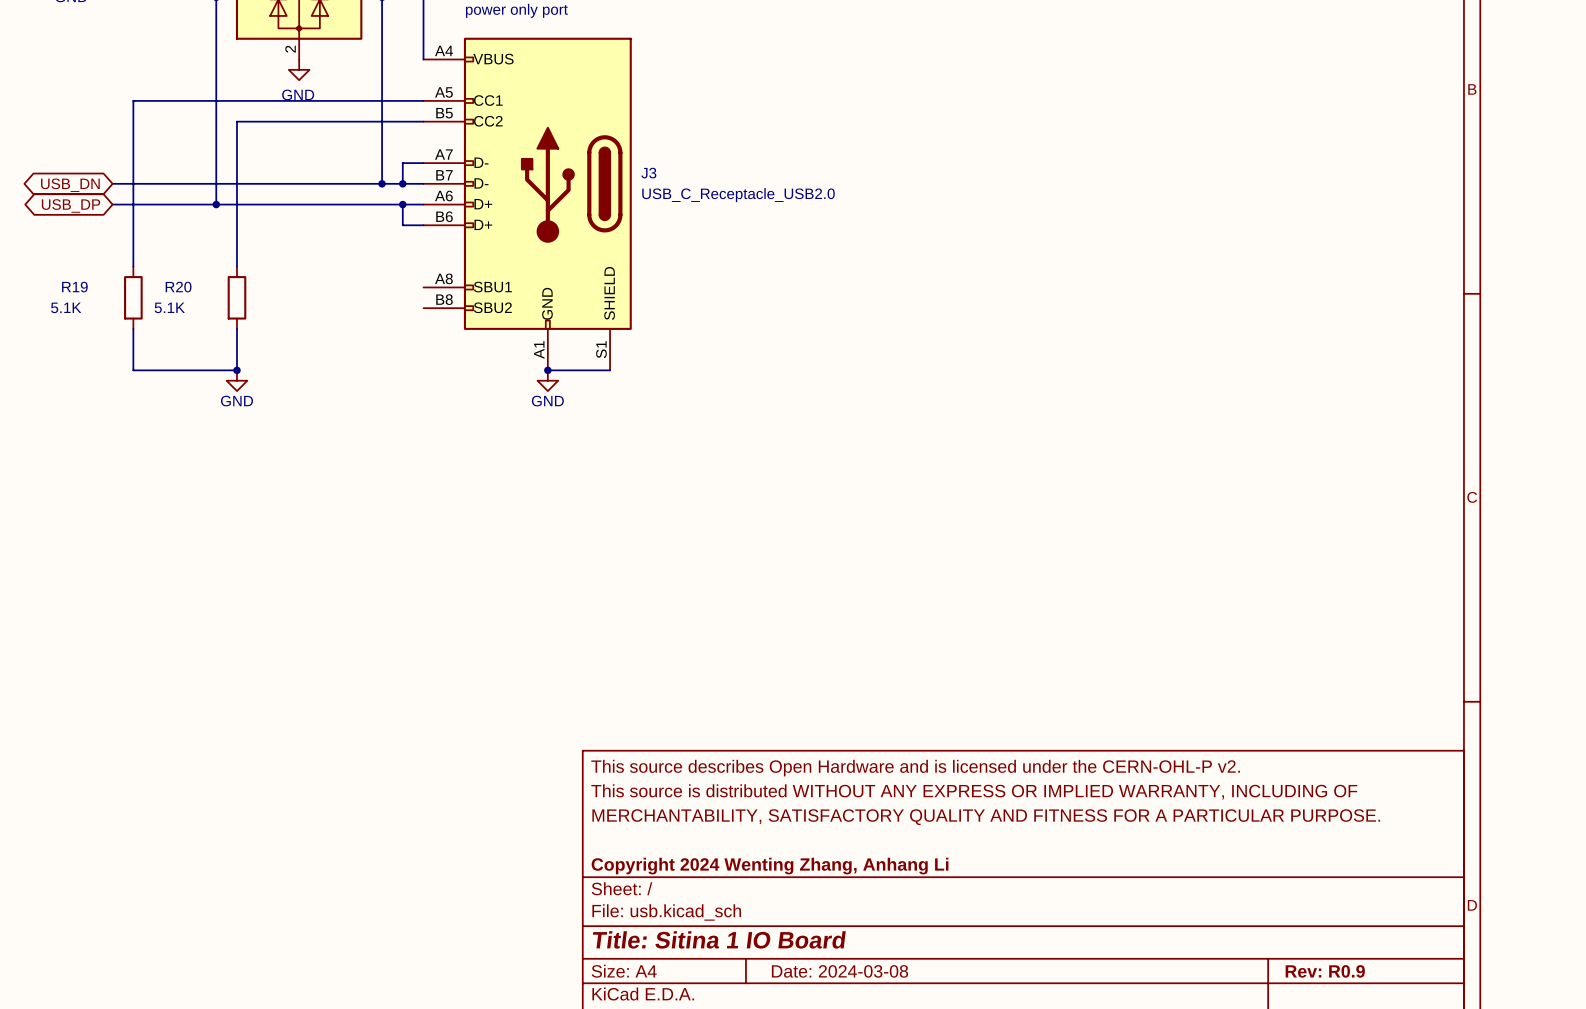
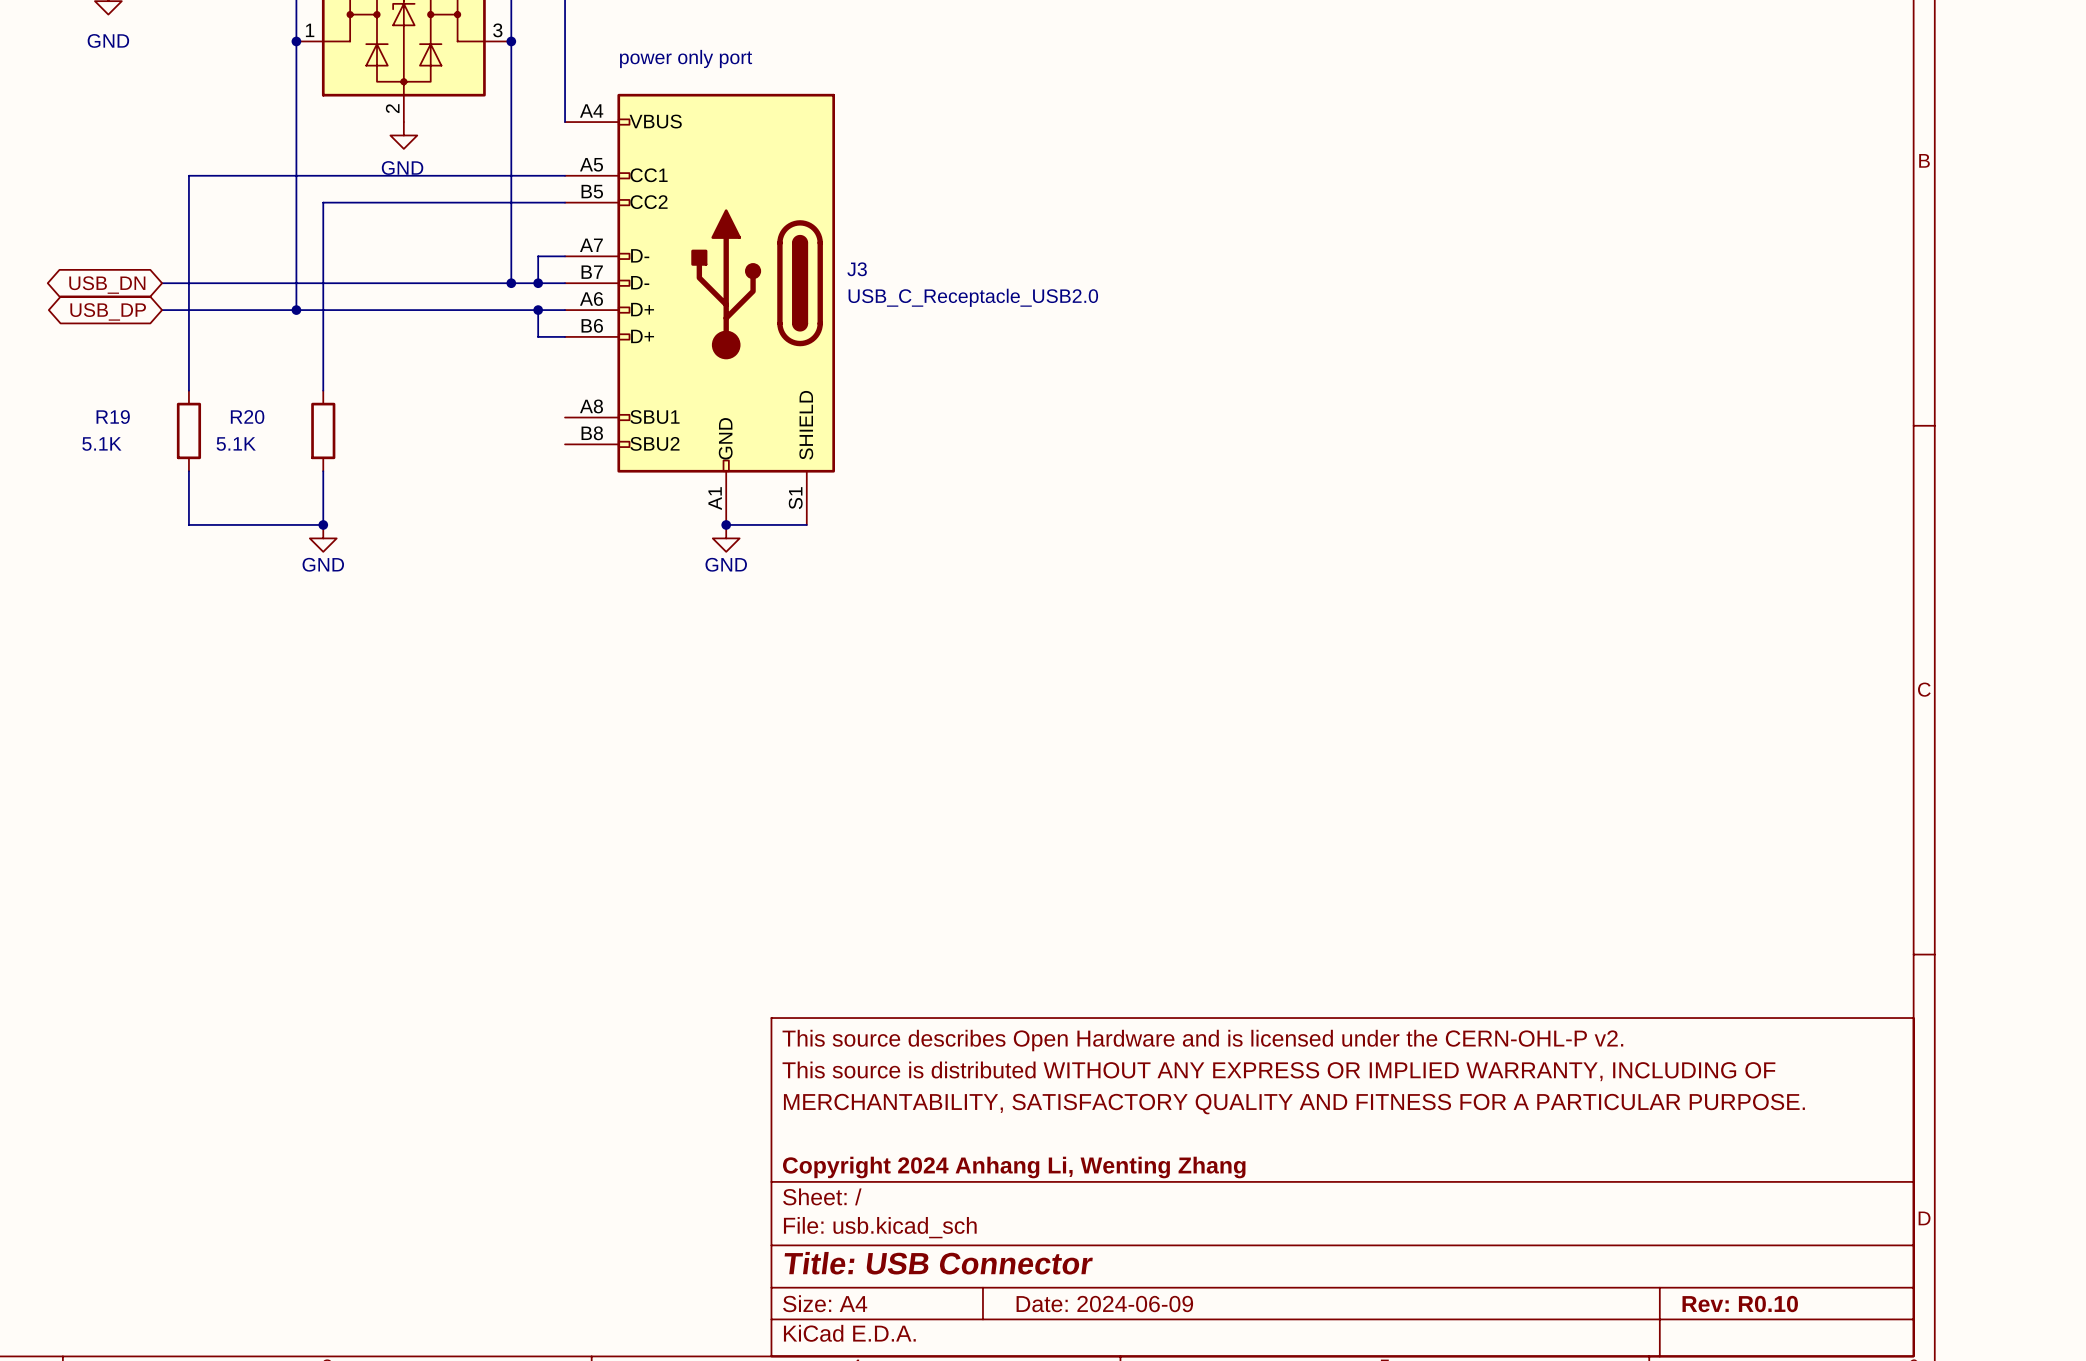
title block: Copyright 2024 Wenting Zhang, Anhang Li (770, 866) -> Copyright 2024 Anhang Li, Wenting Zhang (1014, 1167)
title block: Title: Sitina 1 IO Board (719, 939) -> Title: USB Connector (938, 1263)
title block: Date: 2024-03-08 (840, 971) -> Date: 2024-06-09 (1104, 1304)
title block: Rev: R0.9 (1325, 971) -> Rev: R0.10 (1740, 1304)

